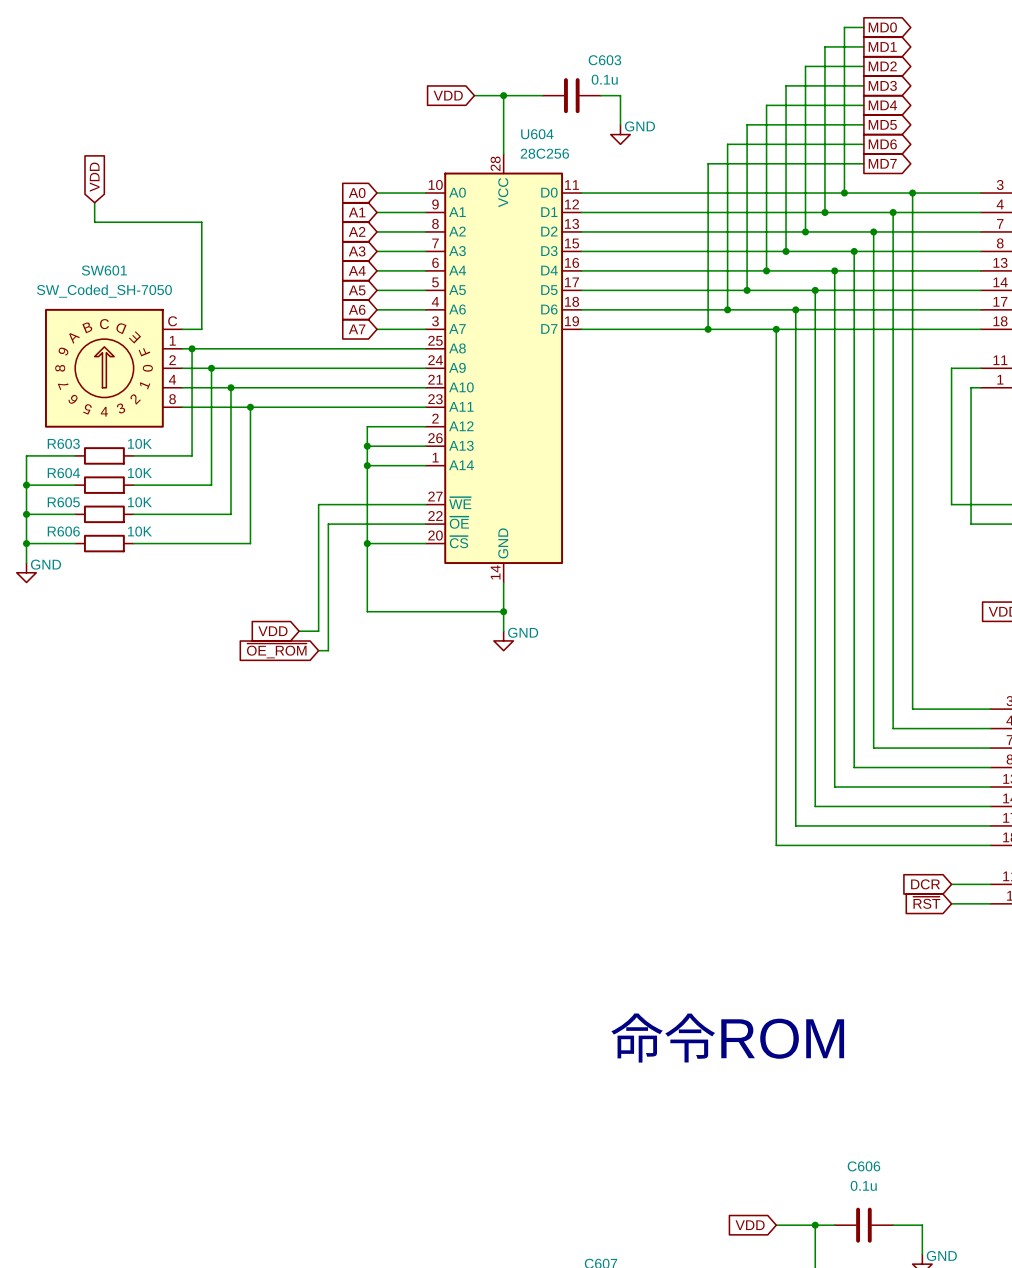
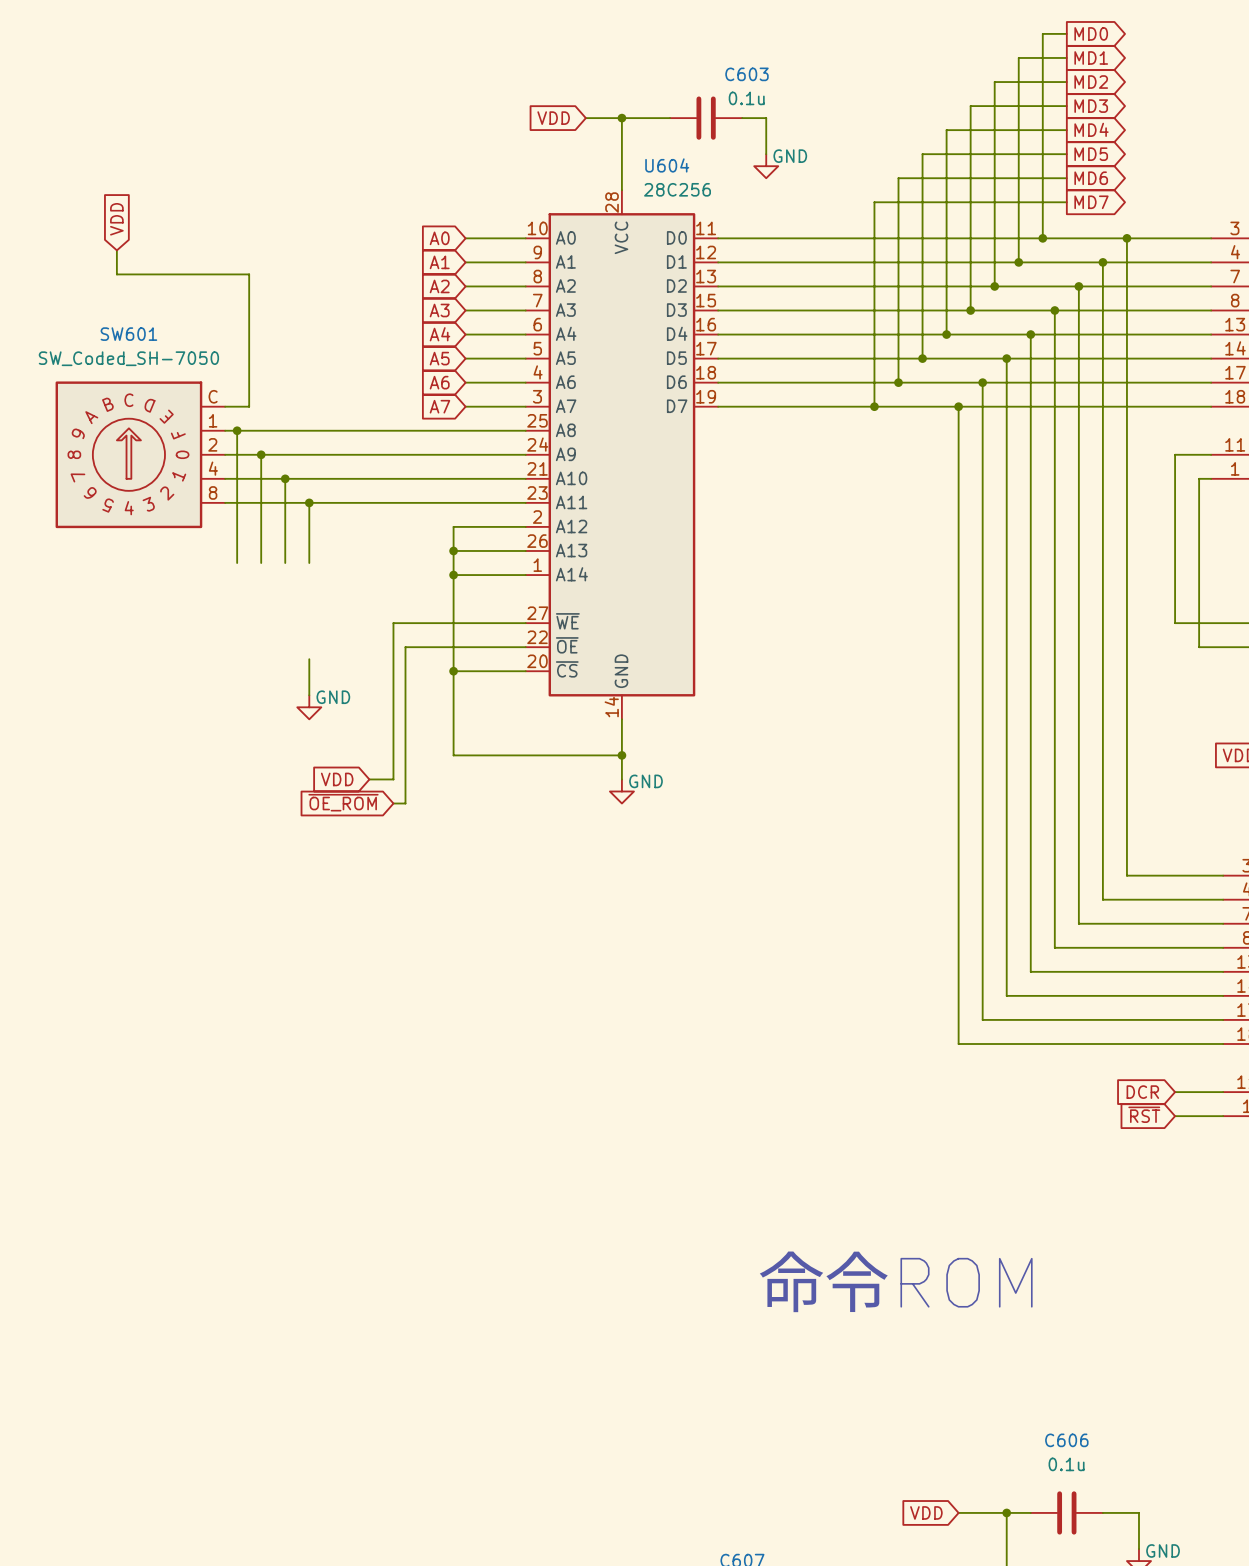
wire: (75, 455) (26, 455) (26, 563) -> none
R603: 10K (104, 455) -> none
wire: (133, 455) (192, 455) -> none
wire: (211, 455) (211, 485) (133, 485) -> none
wire: (230, 455) (230, 514) (133, 514) -> none
wire: (250, 455) (250, 533) -> none
wire: (26, 485) (75, 485) -> none
junction: (26, 485) -> none
R604: 10K (104, 485) -> none
wire: (26, 514) (75, 514) -> none
junction: (26, 514) -> none
R605: 10K (104, 514) -> none
wire: (26, 543) (75, 543) -> none
junction: (26, 543) -> none
R606: 10K (104, 543) -> none
wire: (133, 543) (250, 543) -> (309, 695) (309, 671)
power symbol: GND (26, 572) -> none
power symbol: none -> GND (309, 707)

